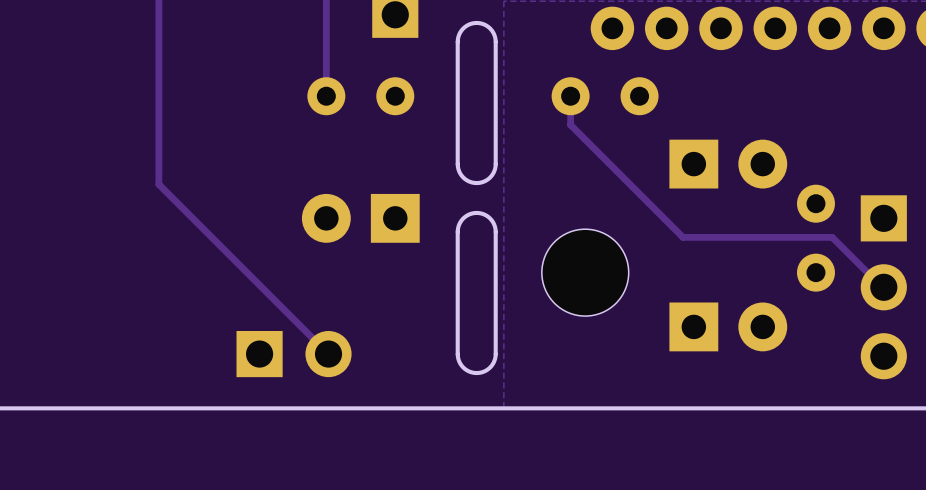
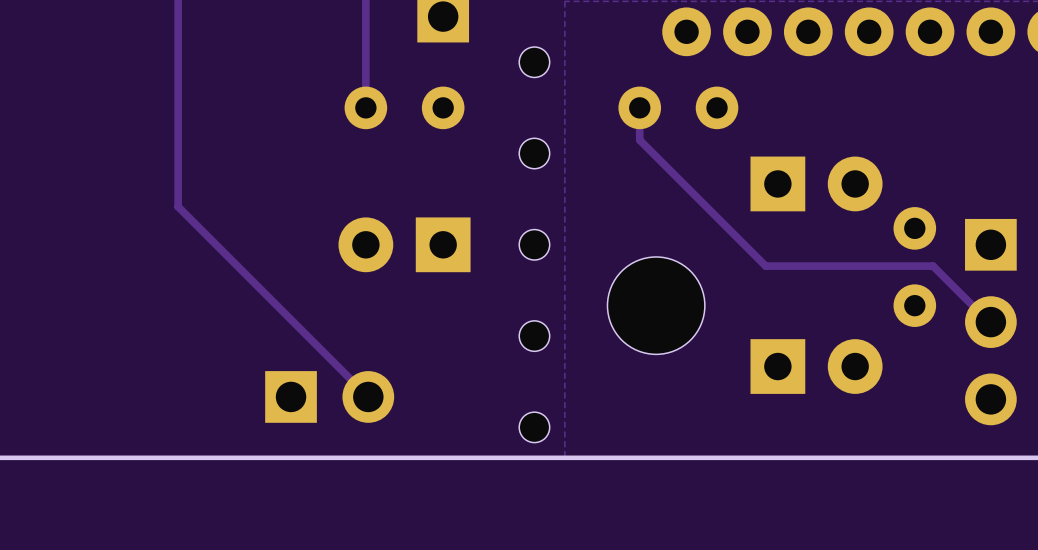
board edge: (495, 41) (495, 166) (488, 179) (474, 182) (463, 177) (457, 166) (457, 39) (465, 26) (479, 23) (491, 30) (495, 41) -> none
part: none -> (534, 62)
part: none -> (534, 153)
part: none -> (534, 244)
board edge: (495, 231) (495, 356) (488, 369) (474, 372) (463, 367) (457, 356) (457, 229) (465, 216) (476, 212) (490, 218) (495, 231) -> none
part: none -> (534, 336)
part: none -> (534, 427)

